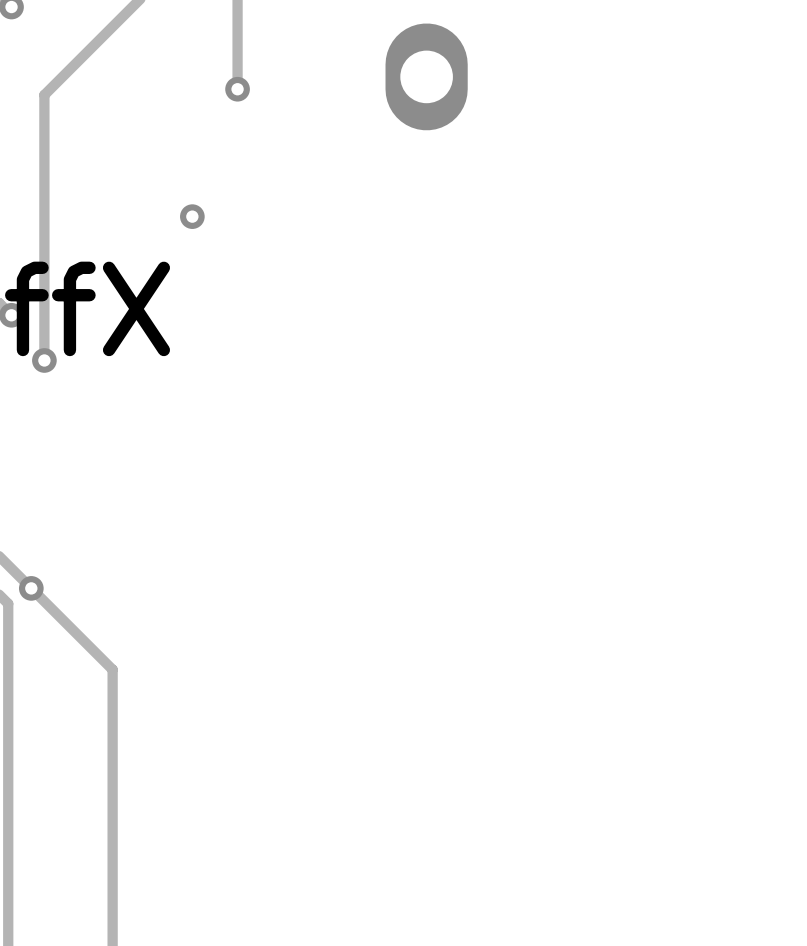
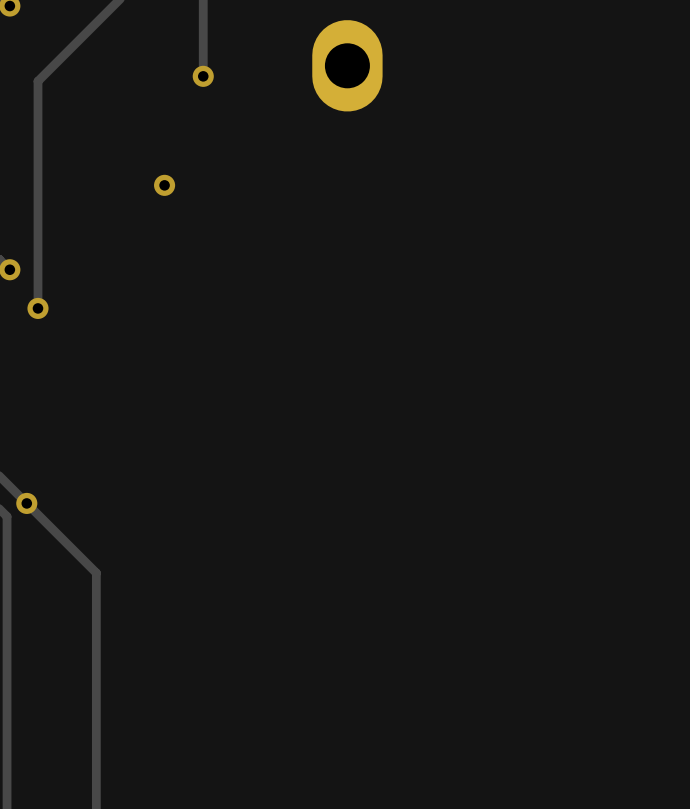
part position: (426, 76) -> (347, 65)

